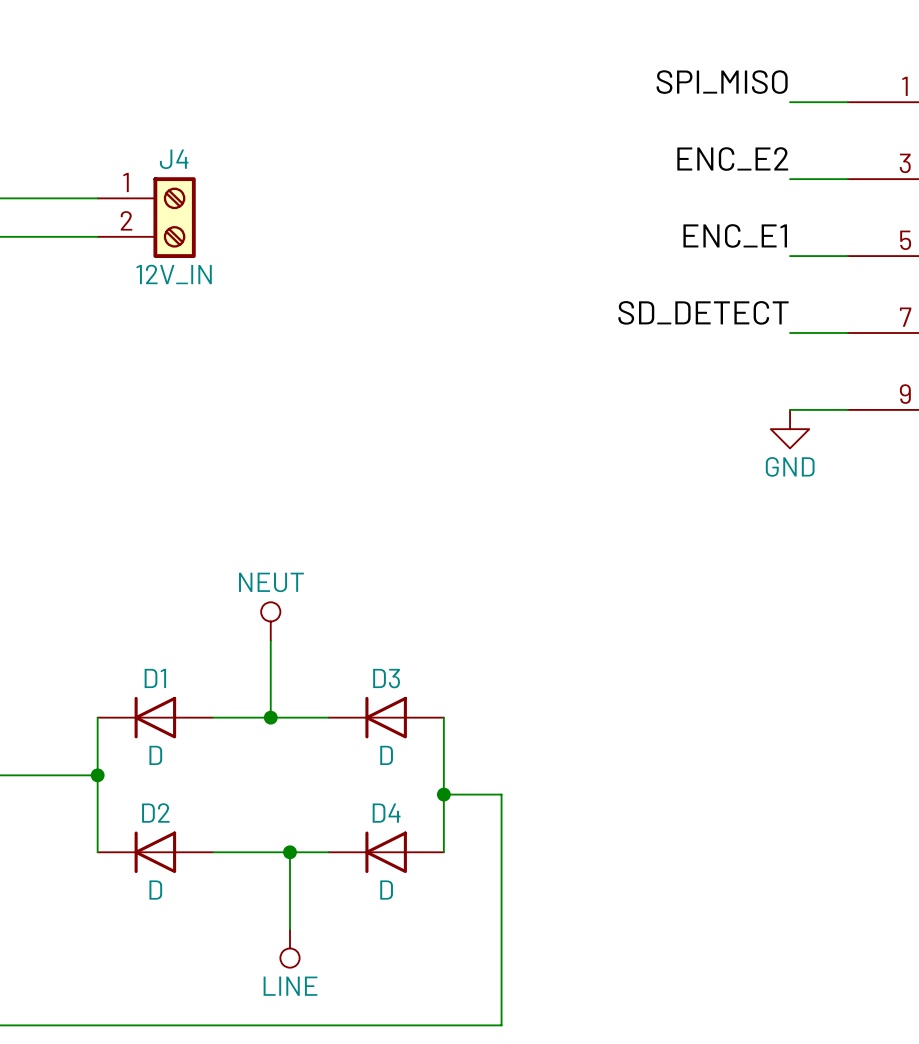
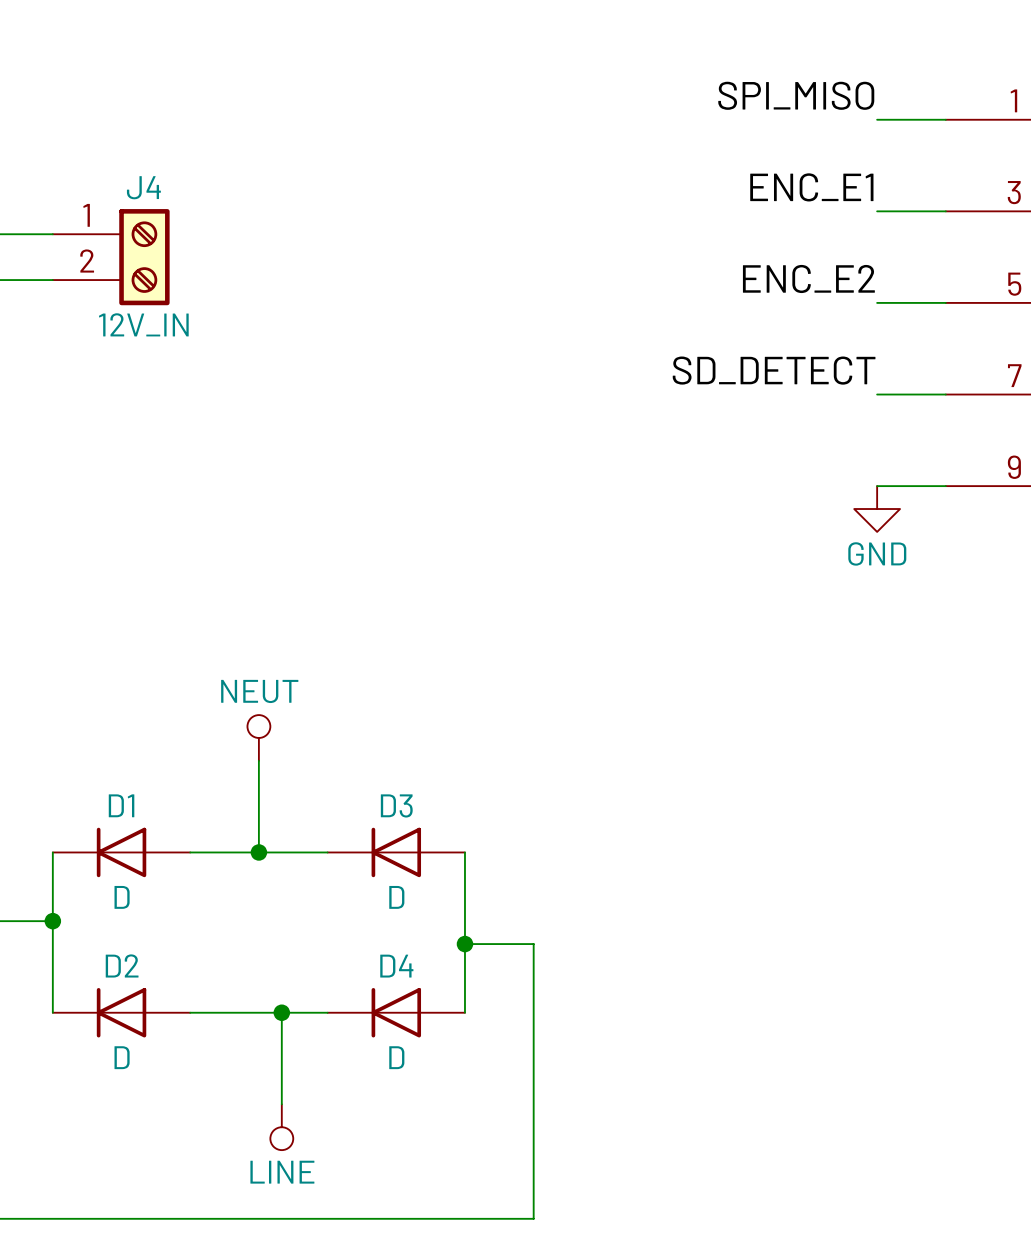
label: ENC_E2 (732, 159) -> ENC_E1 (811, 187)
label: ENC_E1 (735, 235) -> ENC_E2 (808, 278)

